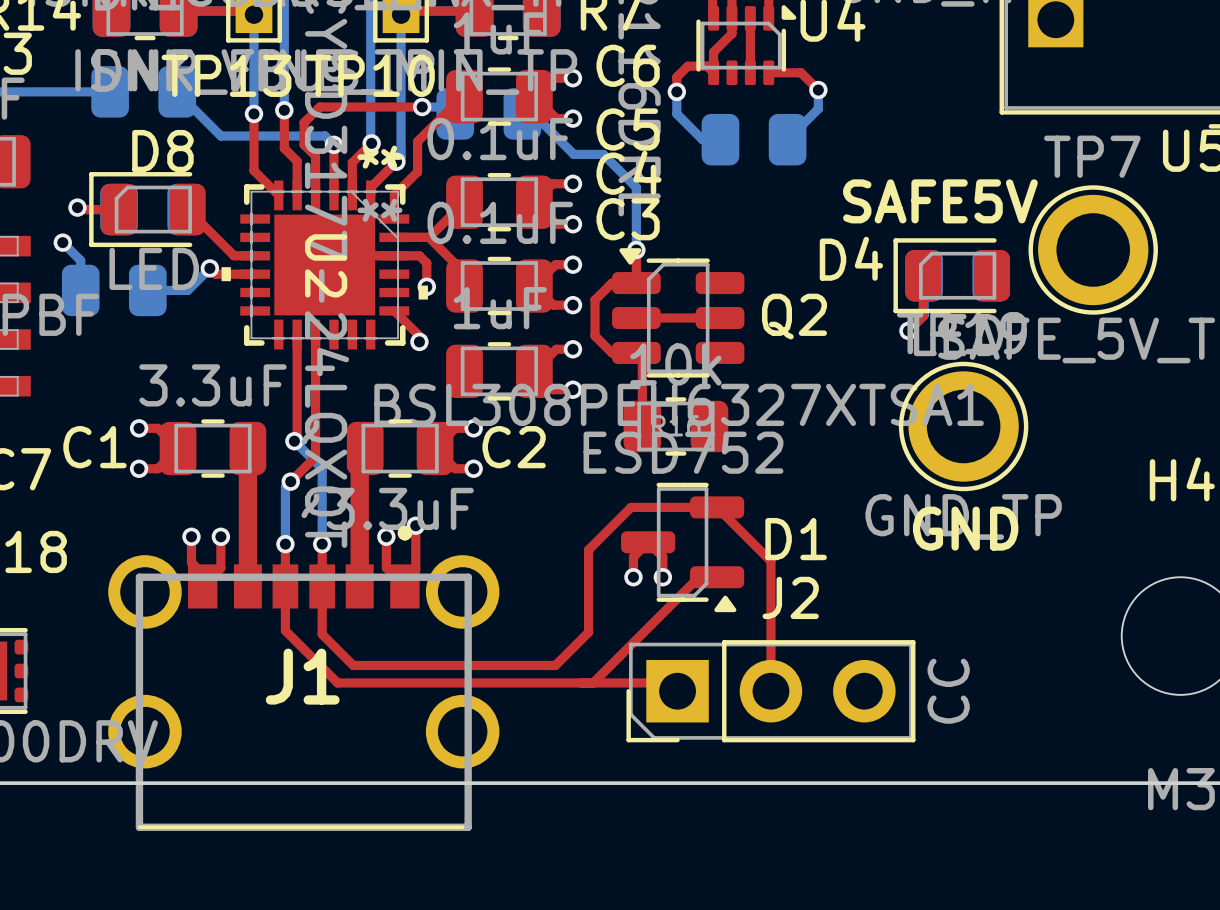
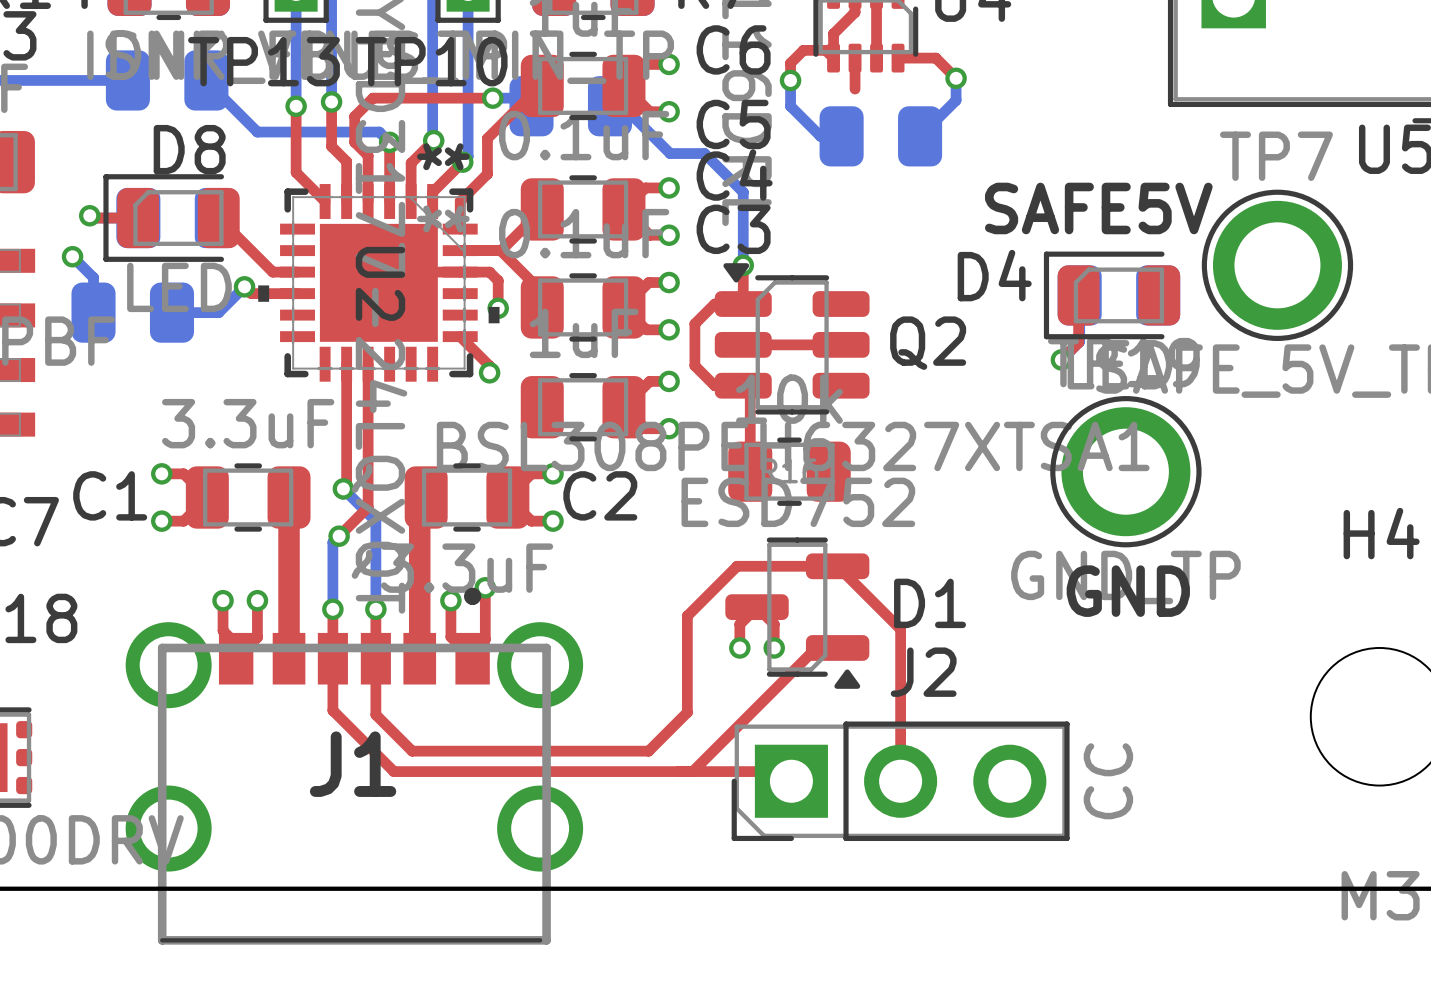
top track: none -> (855, 58) (855, 89)

